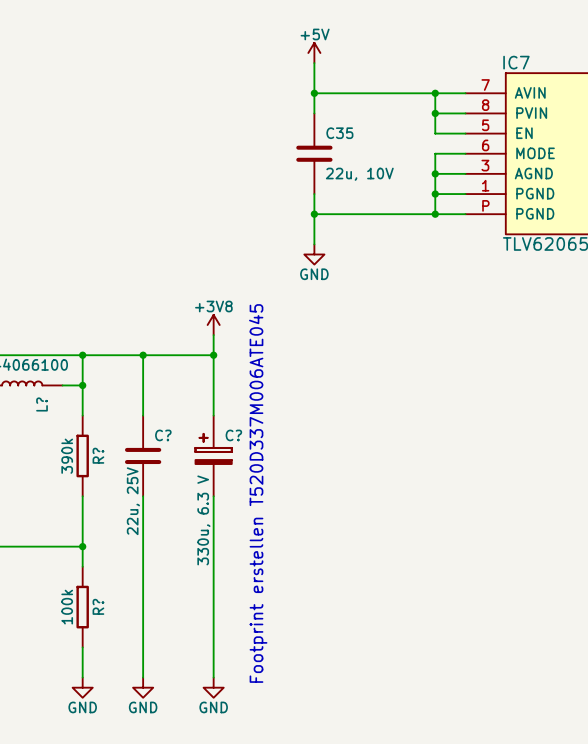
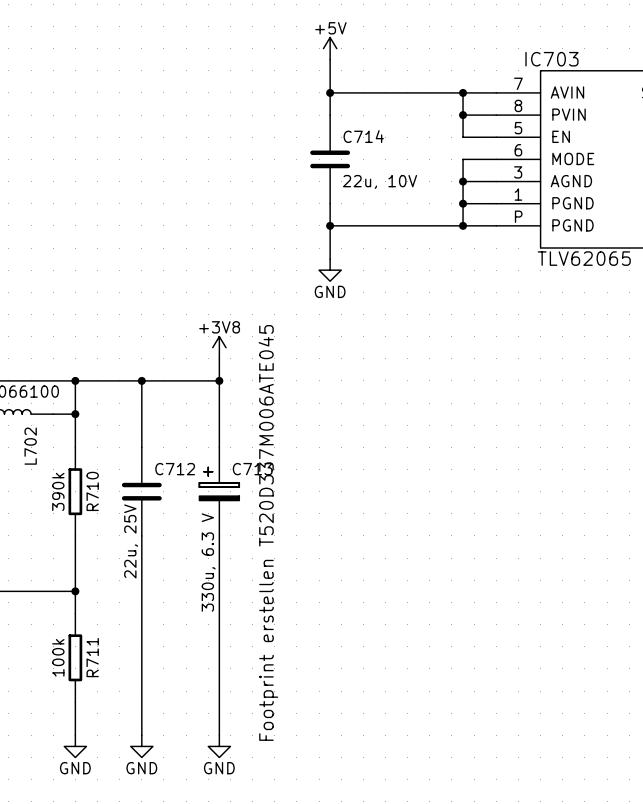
IC7 name: IC7 (516, 62) -> IC703 (551, 59)
C35 name: C35 (339, 133) -> C714 (363, 136)
L? name: L? (42, 404) -> L702 (30, 446)
C? name: C? (163, 435) -> C712 (175, 469)
C? name: C? (233, 435) -> C713 (252, 469)
R? name: R? (98, 455) -> R710 (92, 491)
R? name: R? (98, 606) -> R711 (92, 657)

